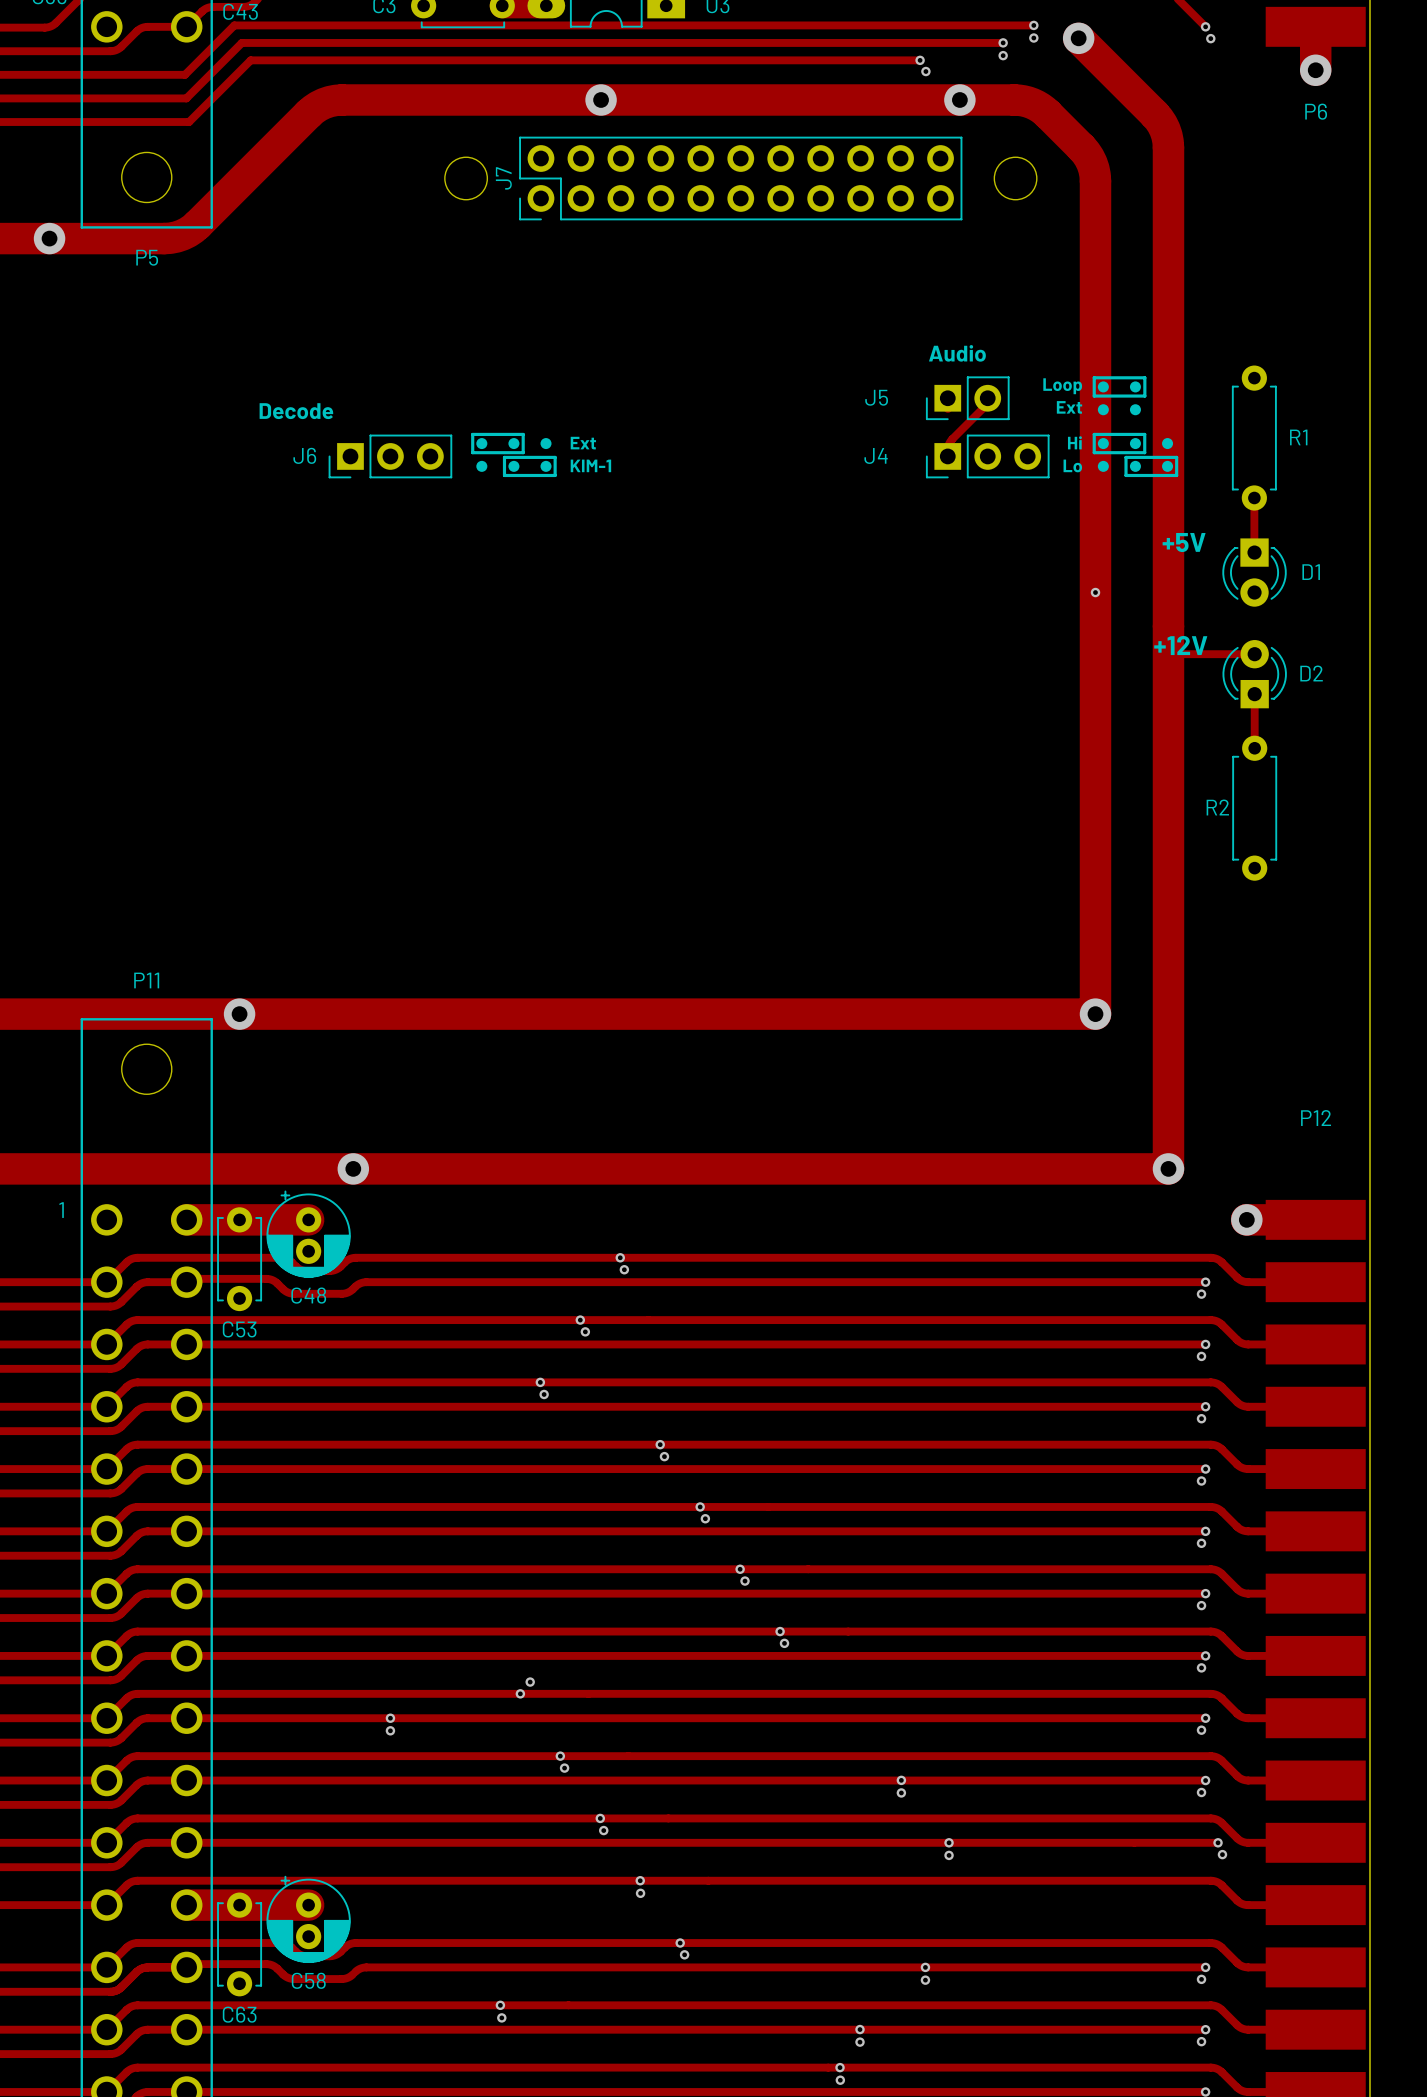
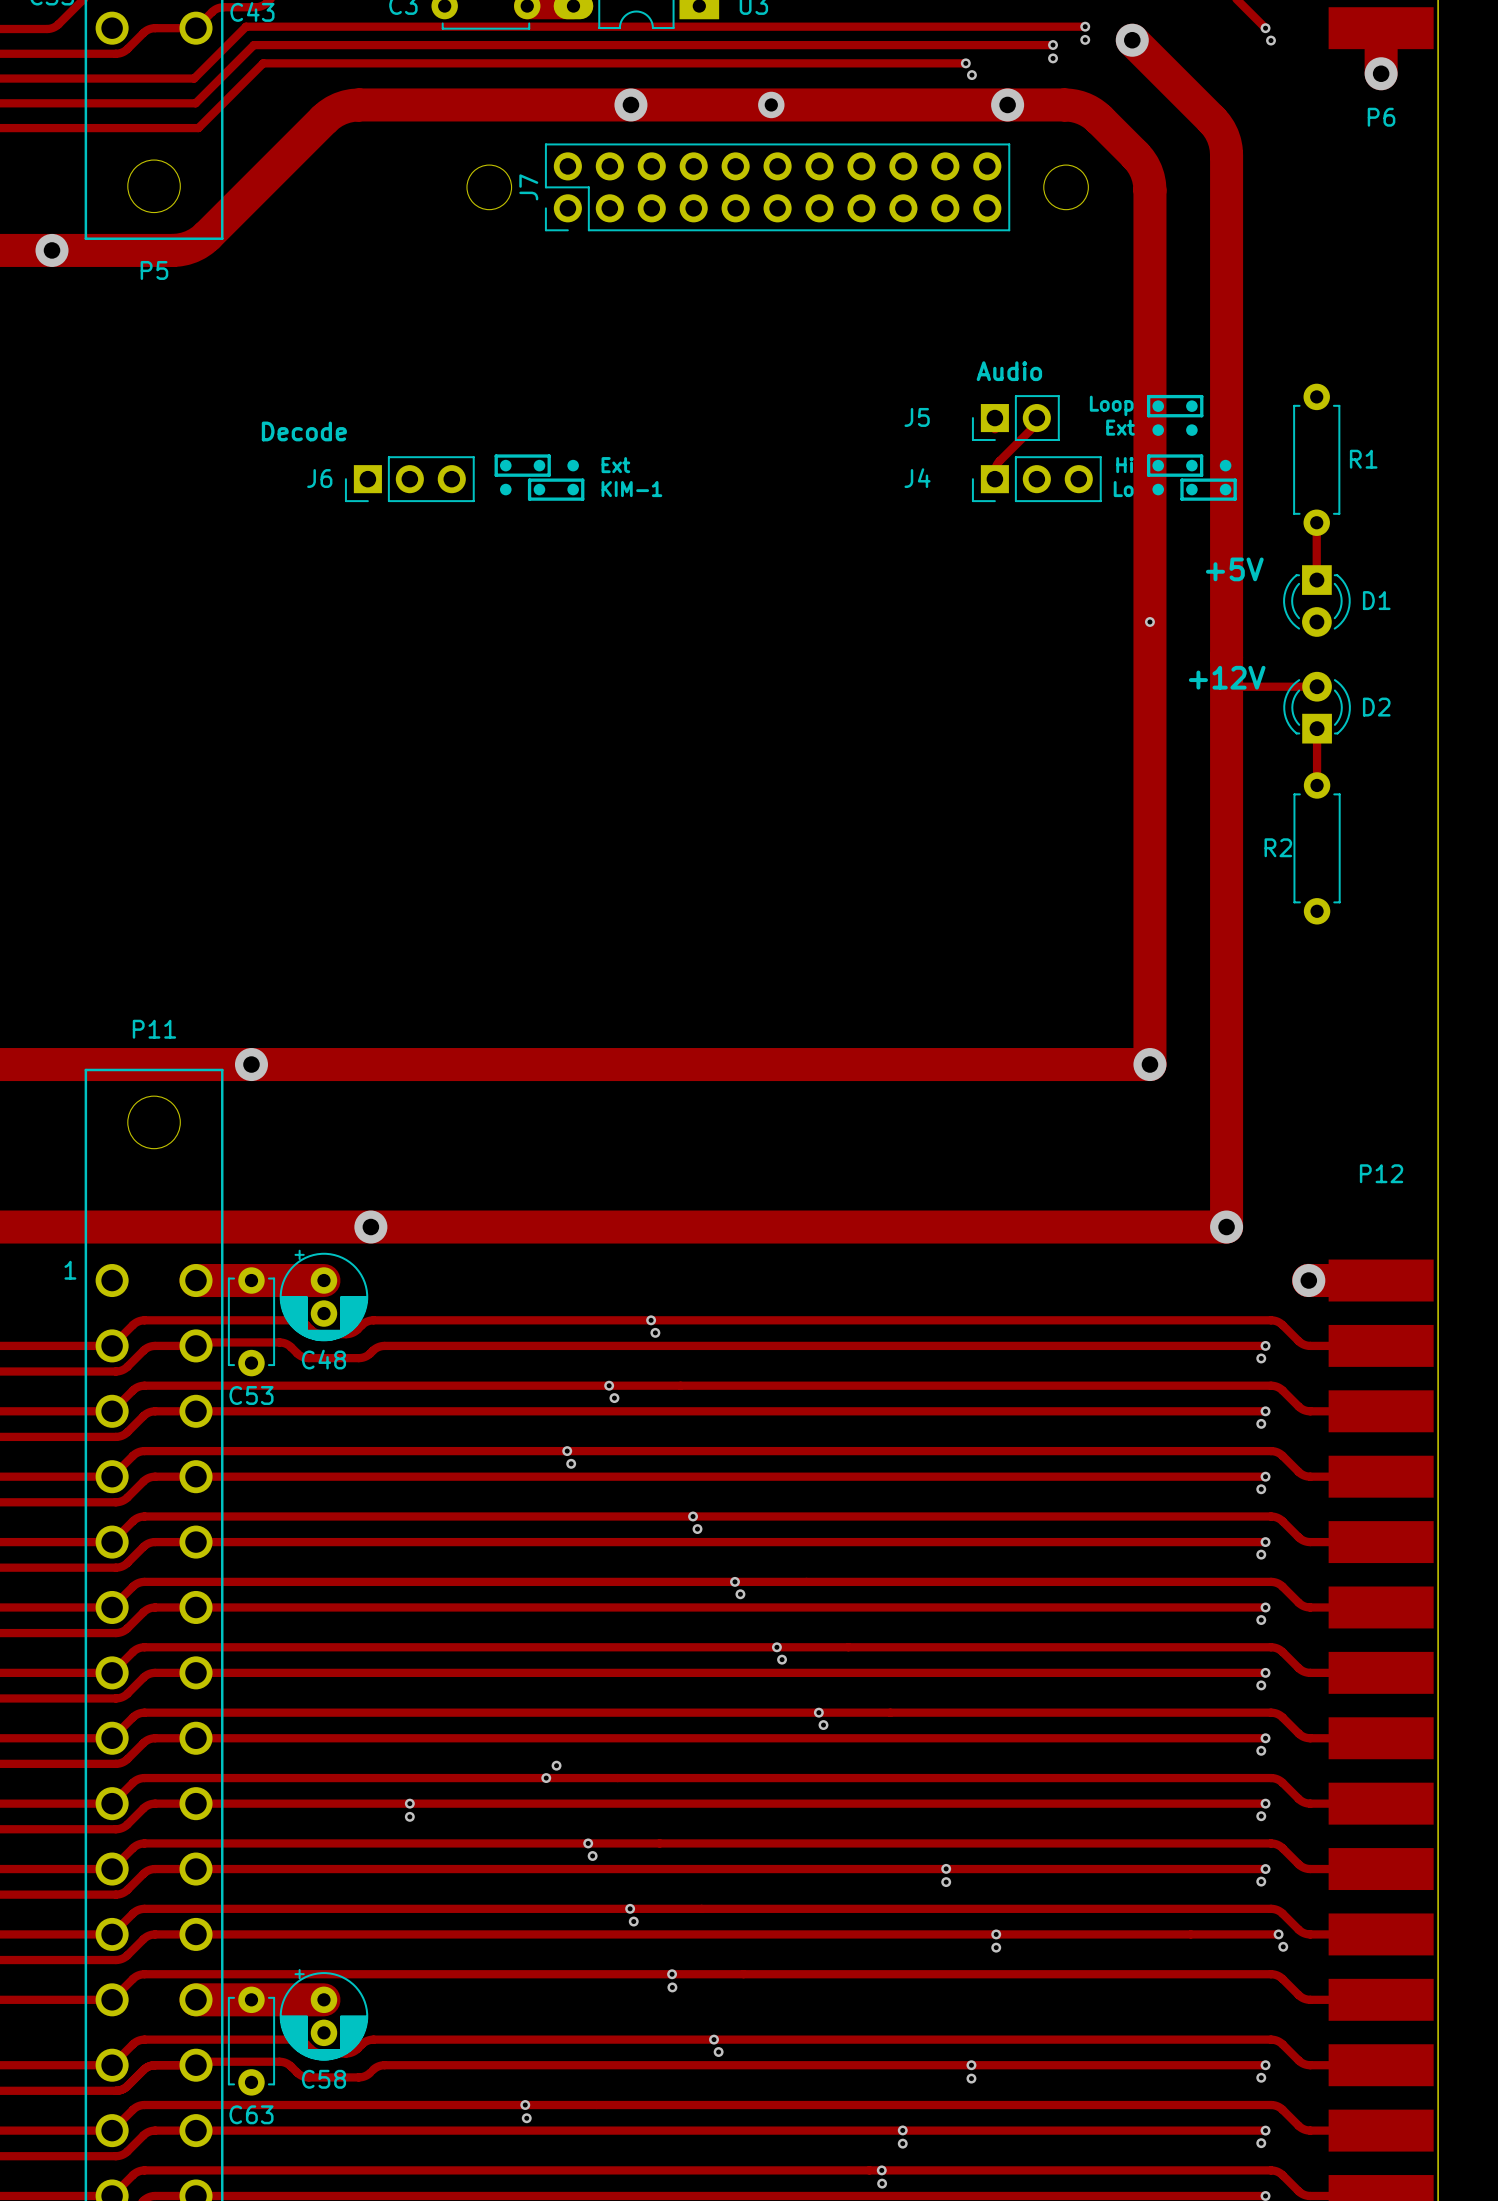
via: none -> (771, 104)

